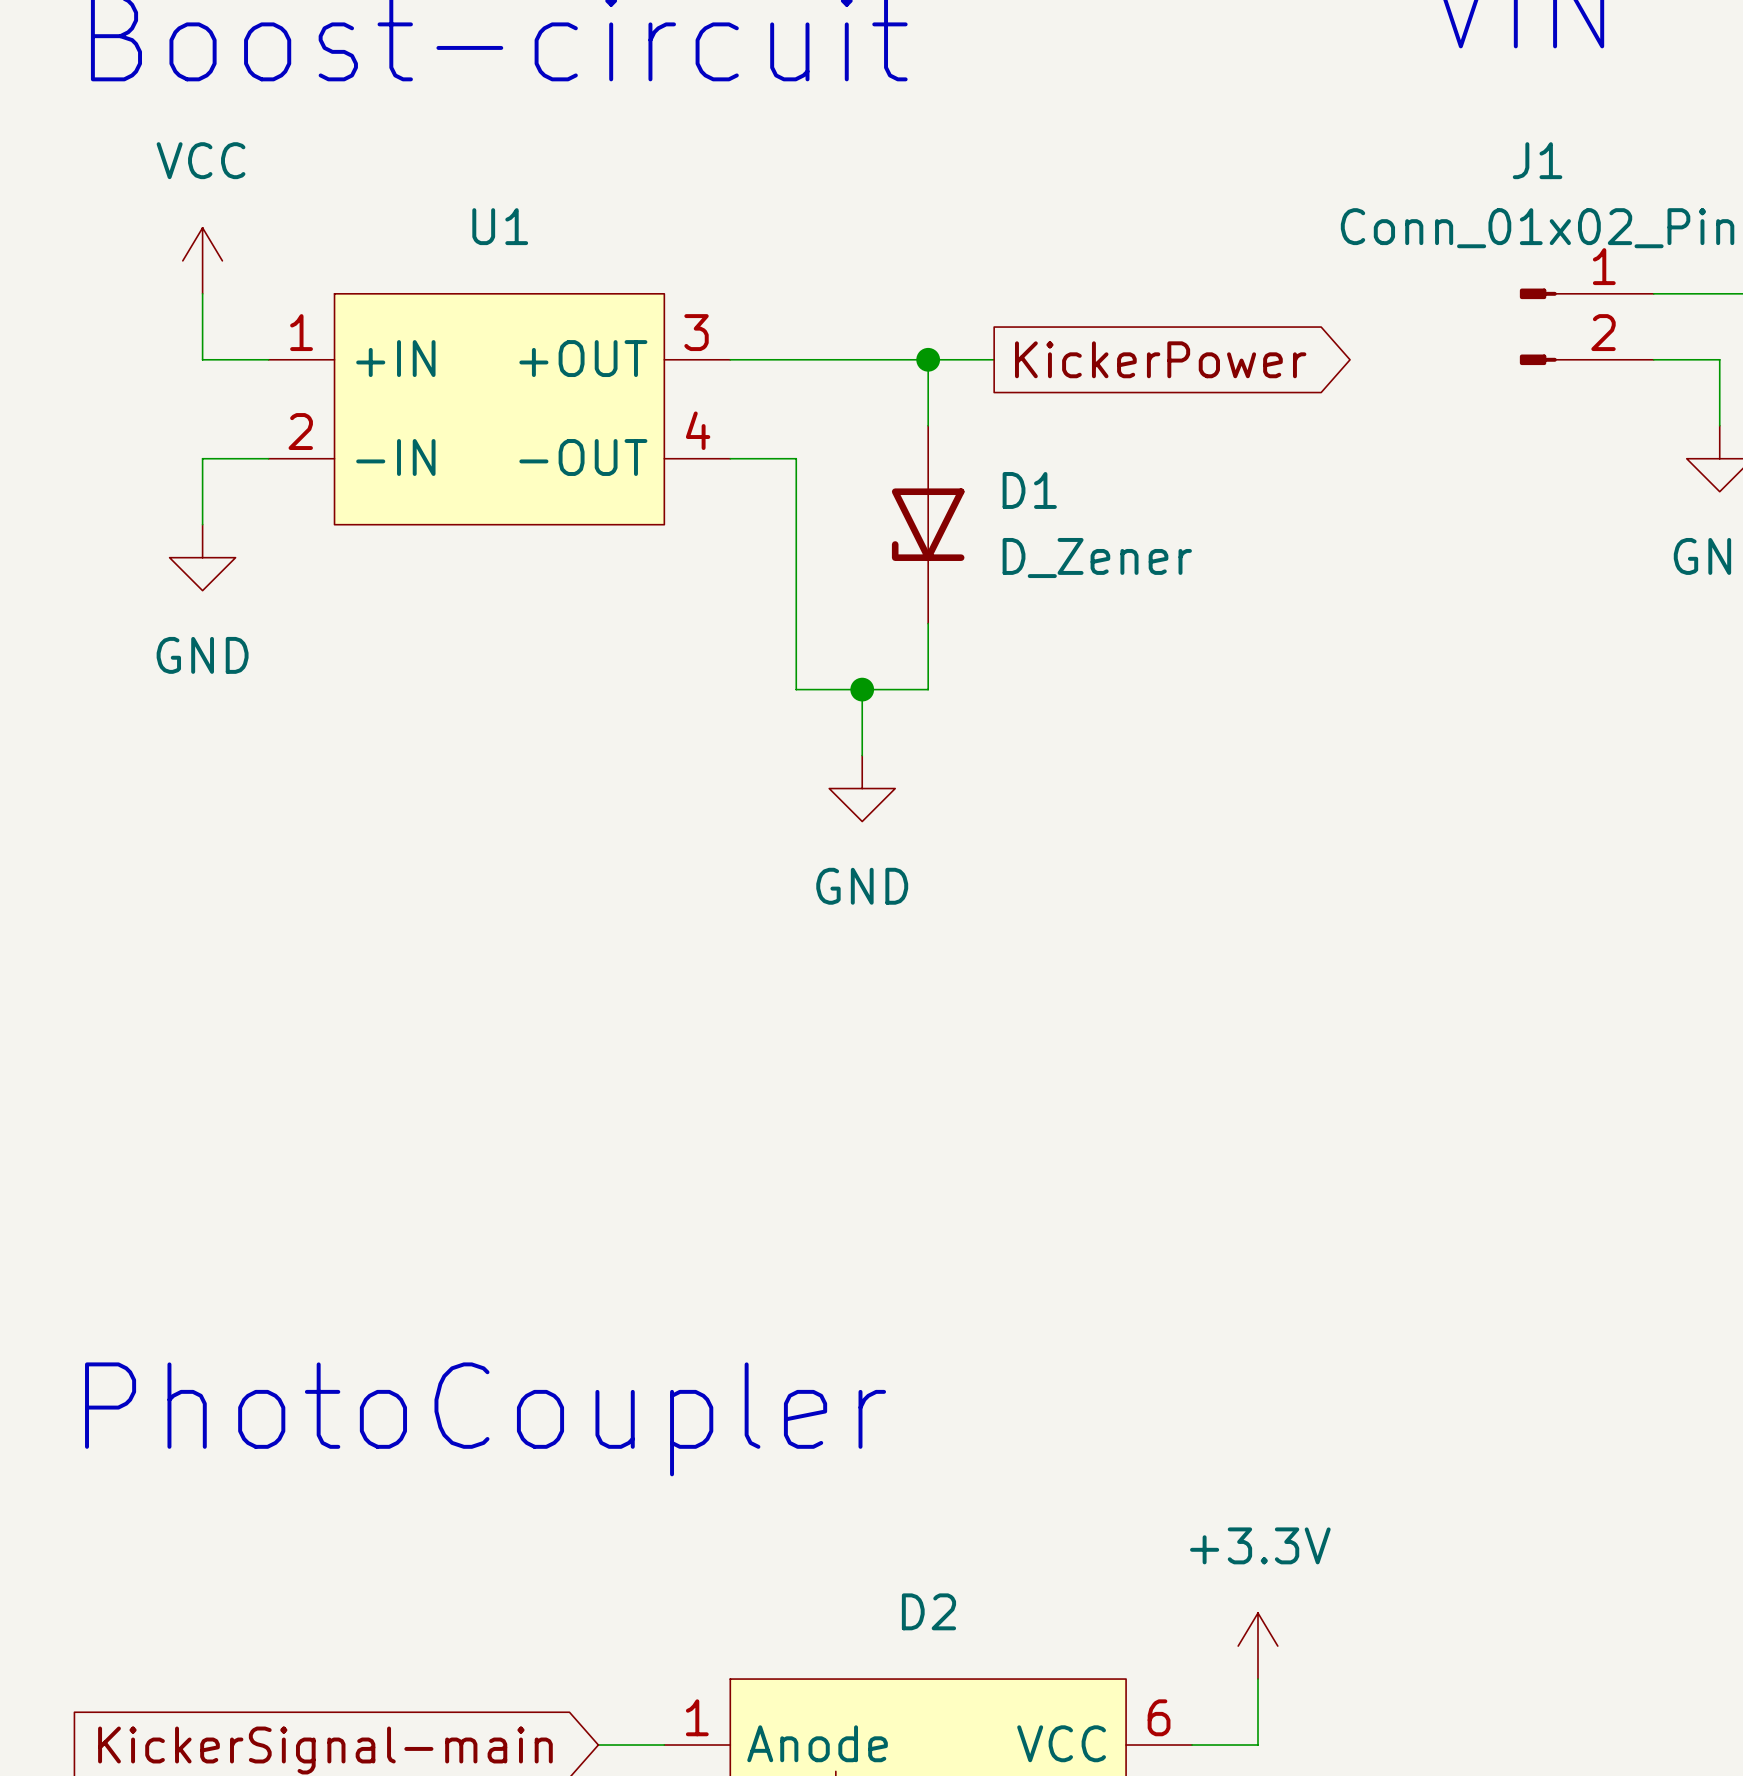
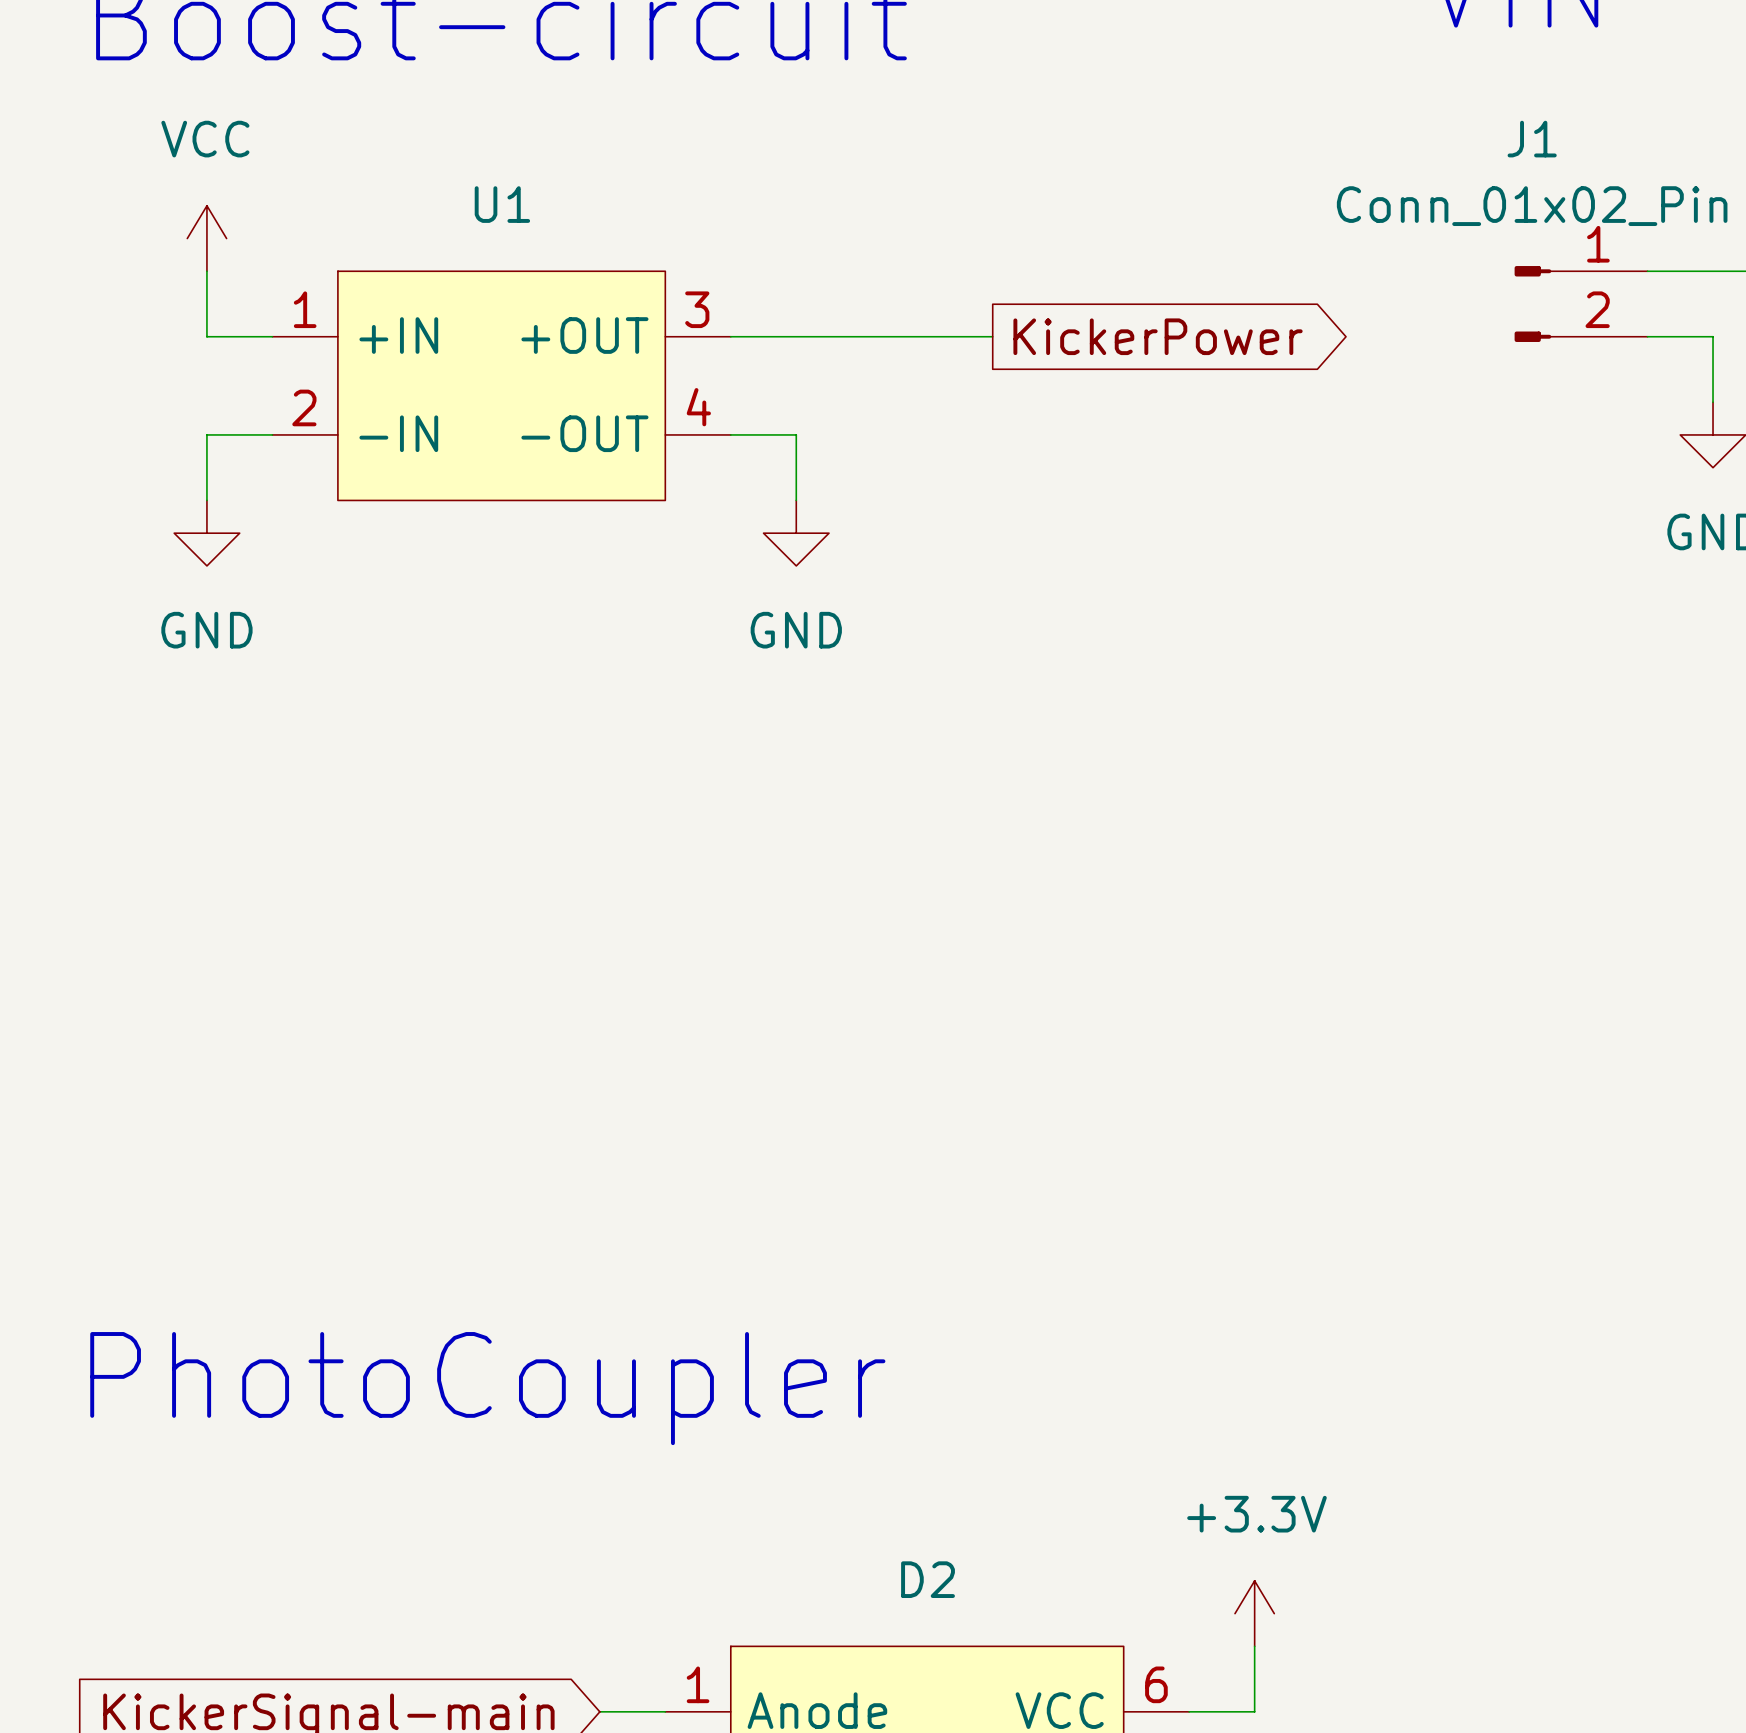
wire: (928, 359) (928, 425) -> none
junction: (928, 359) -> none
wire: (796, 524) (796, 689) (928, 689) (928, 623) -> none
D1: D_Zener (928, 524) -> none
wire: (862, 689) (862, 755) -> none
junction: (862, 689) -> none
power symbol position: GND (862, 788) -> GND (796, 533)

